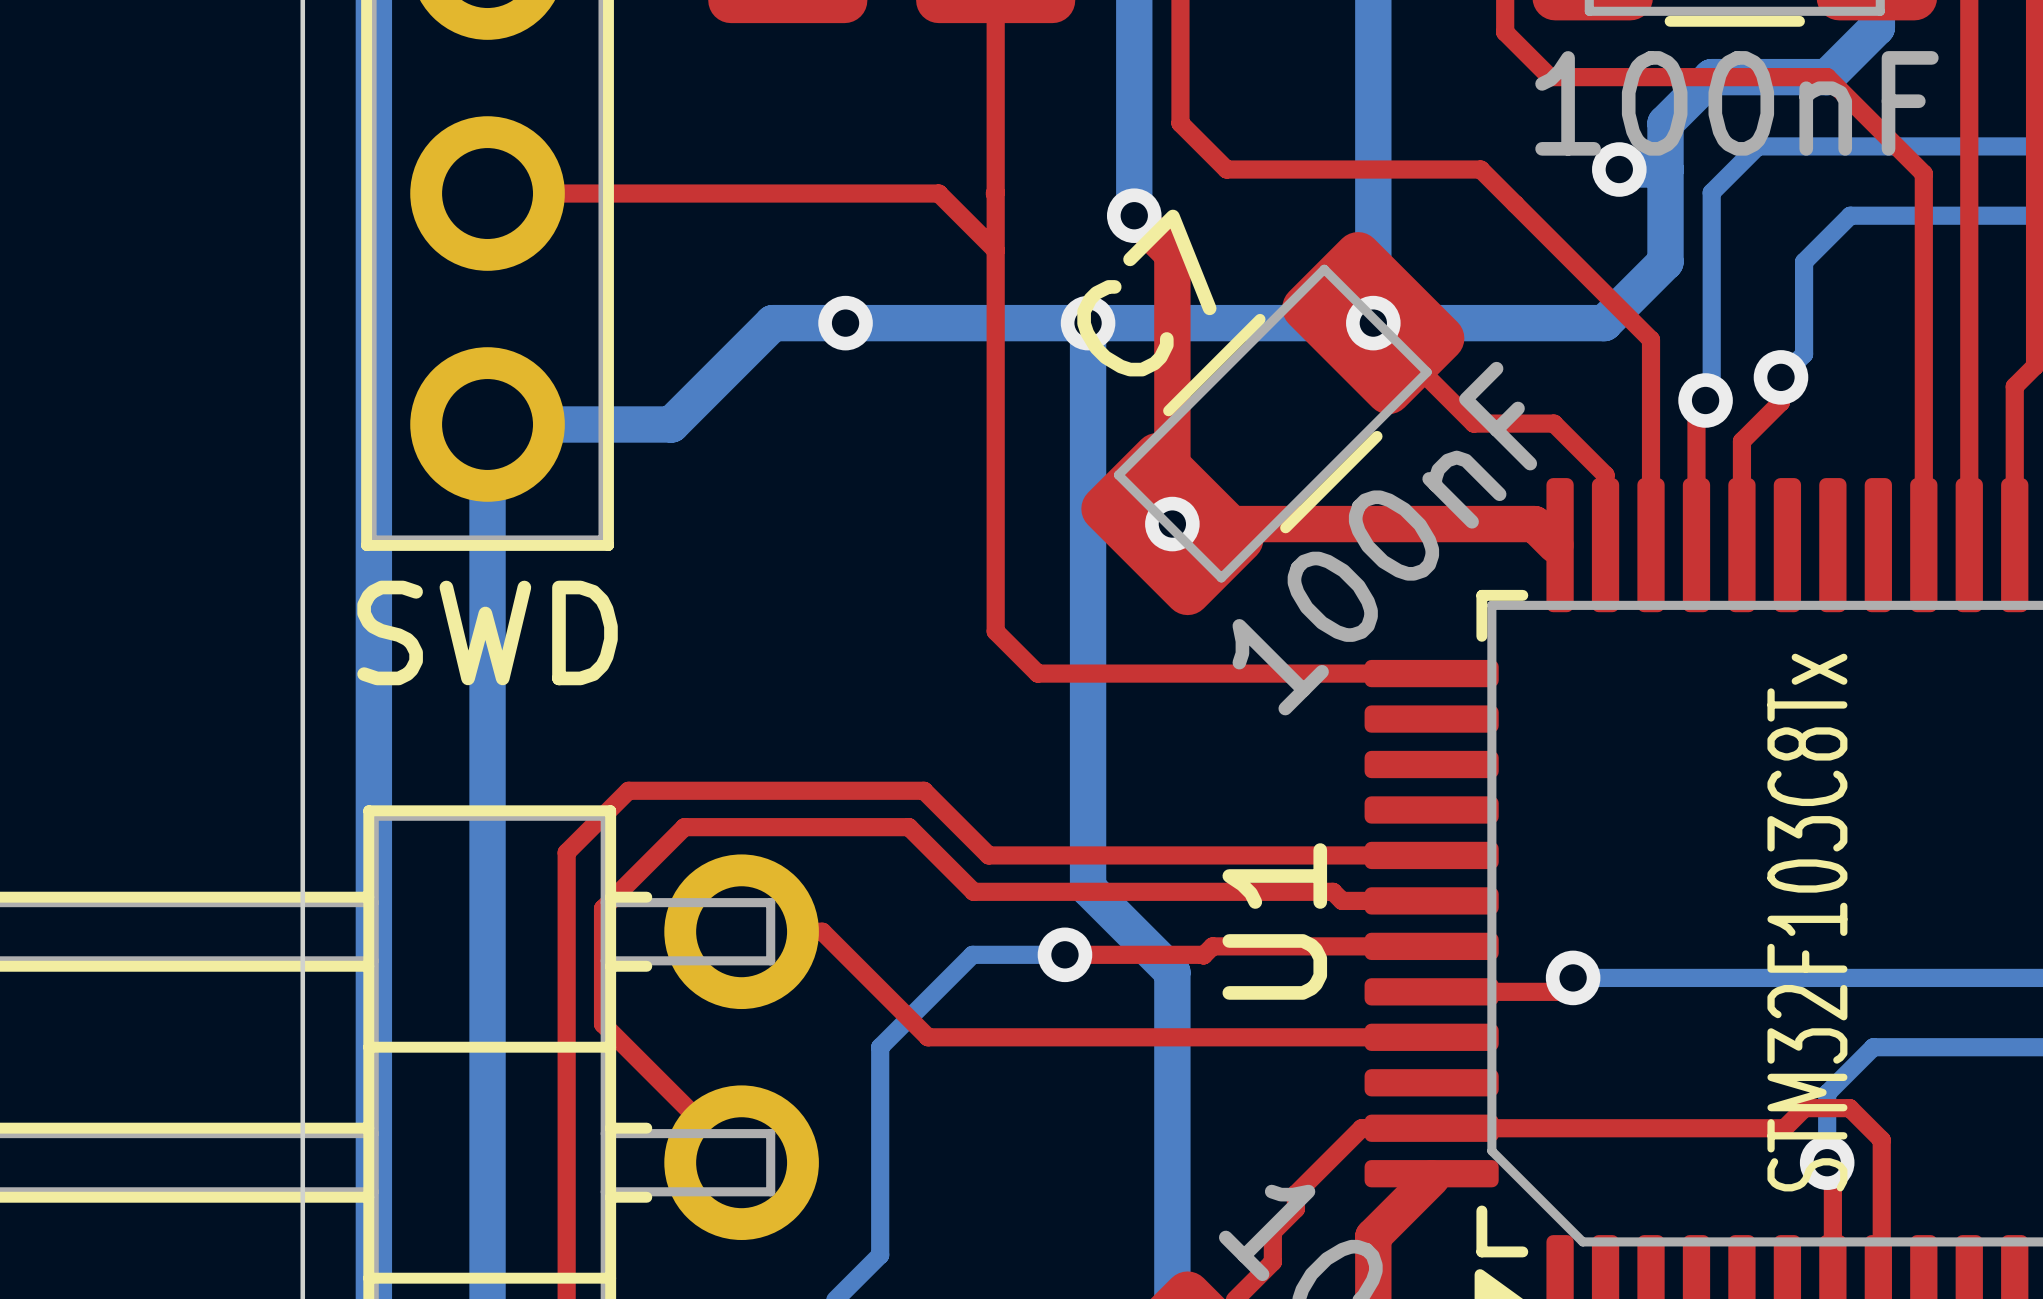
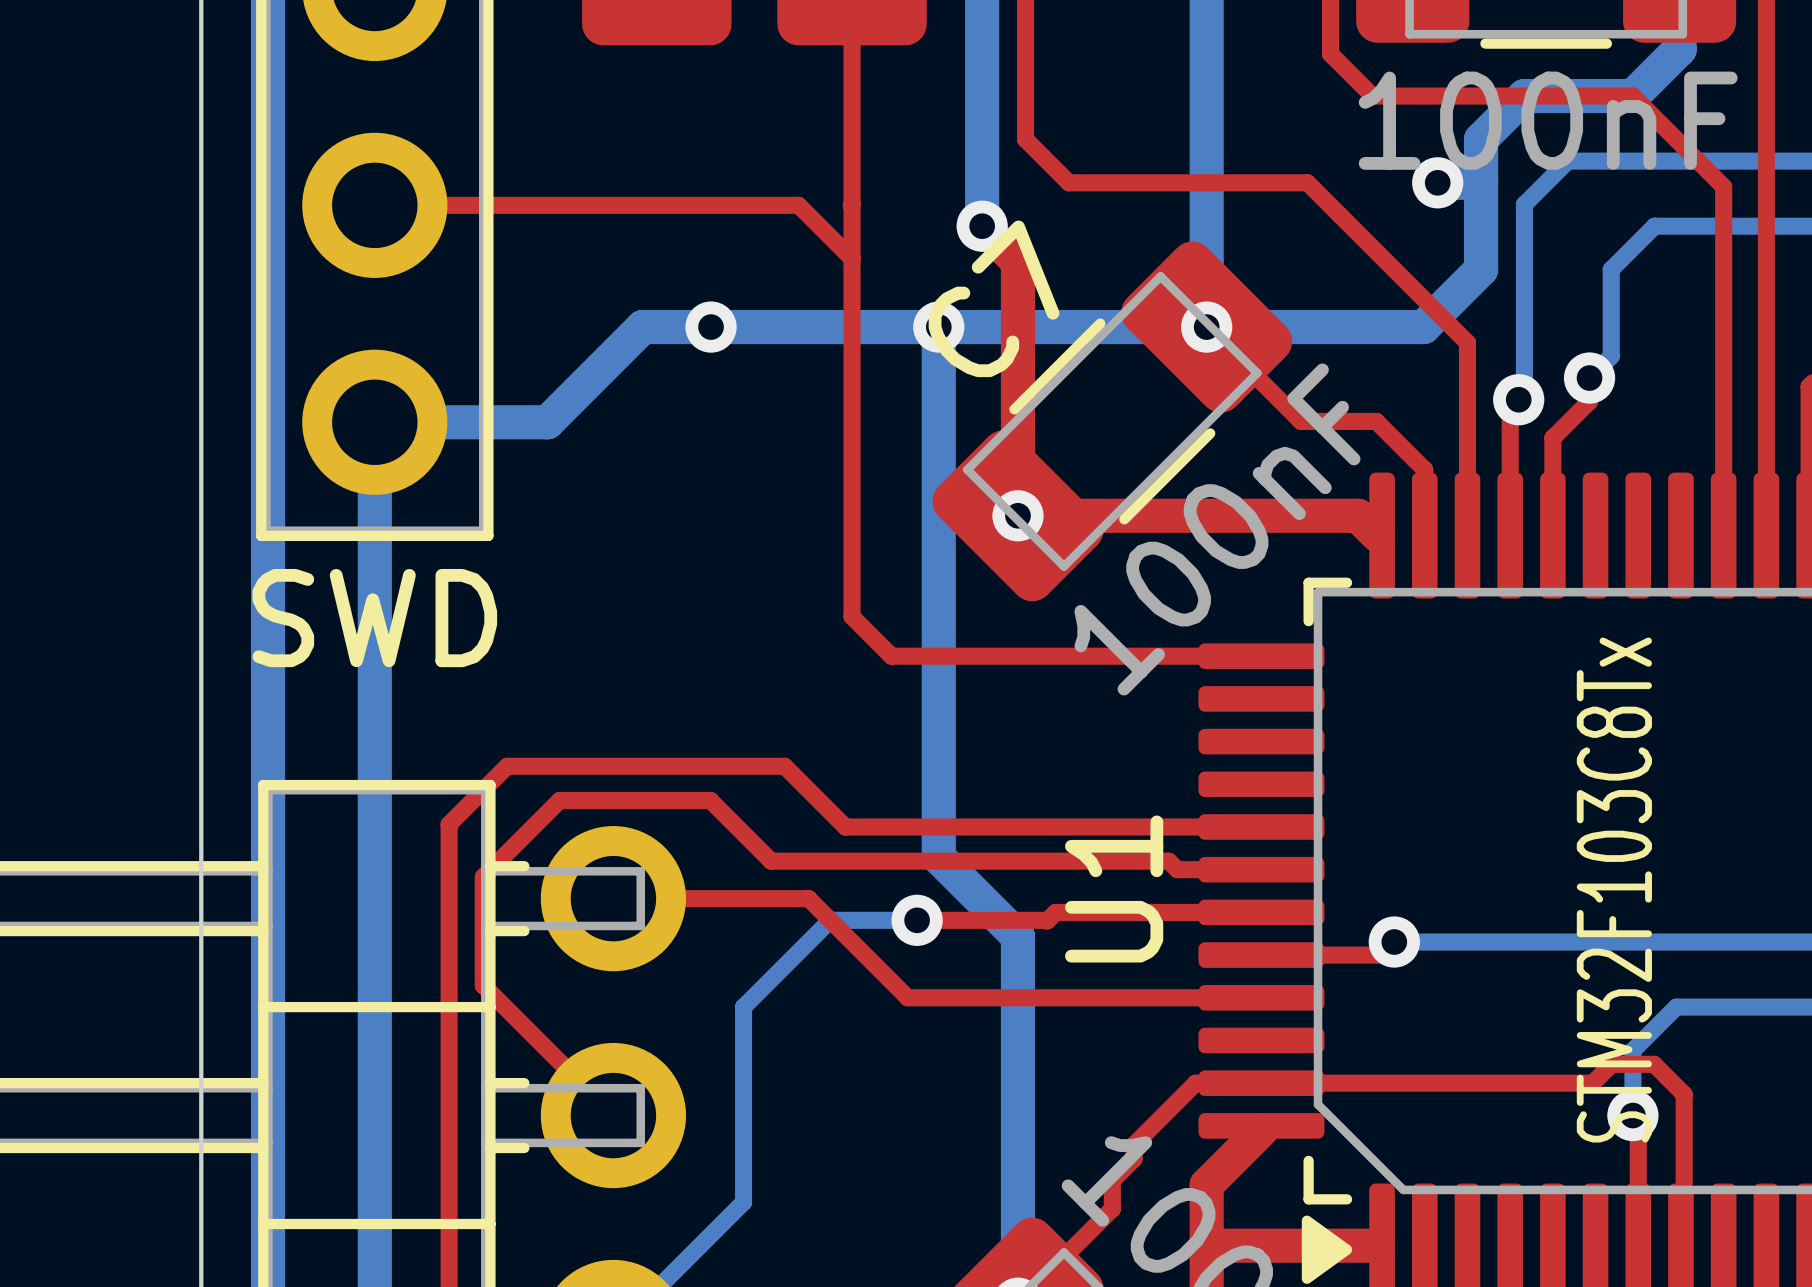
top track: (844, 827) (908, 827) (973, 891) -> (710, 800) (771, 861) (831, 861)
top track: (822, 931) (928, 1037) (1055, 1037) -> (689, 898) (808, 898) (907, 997)

